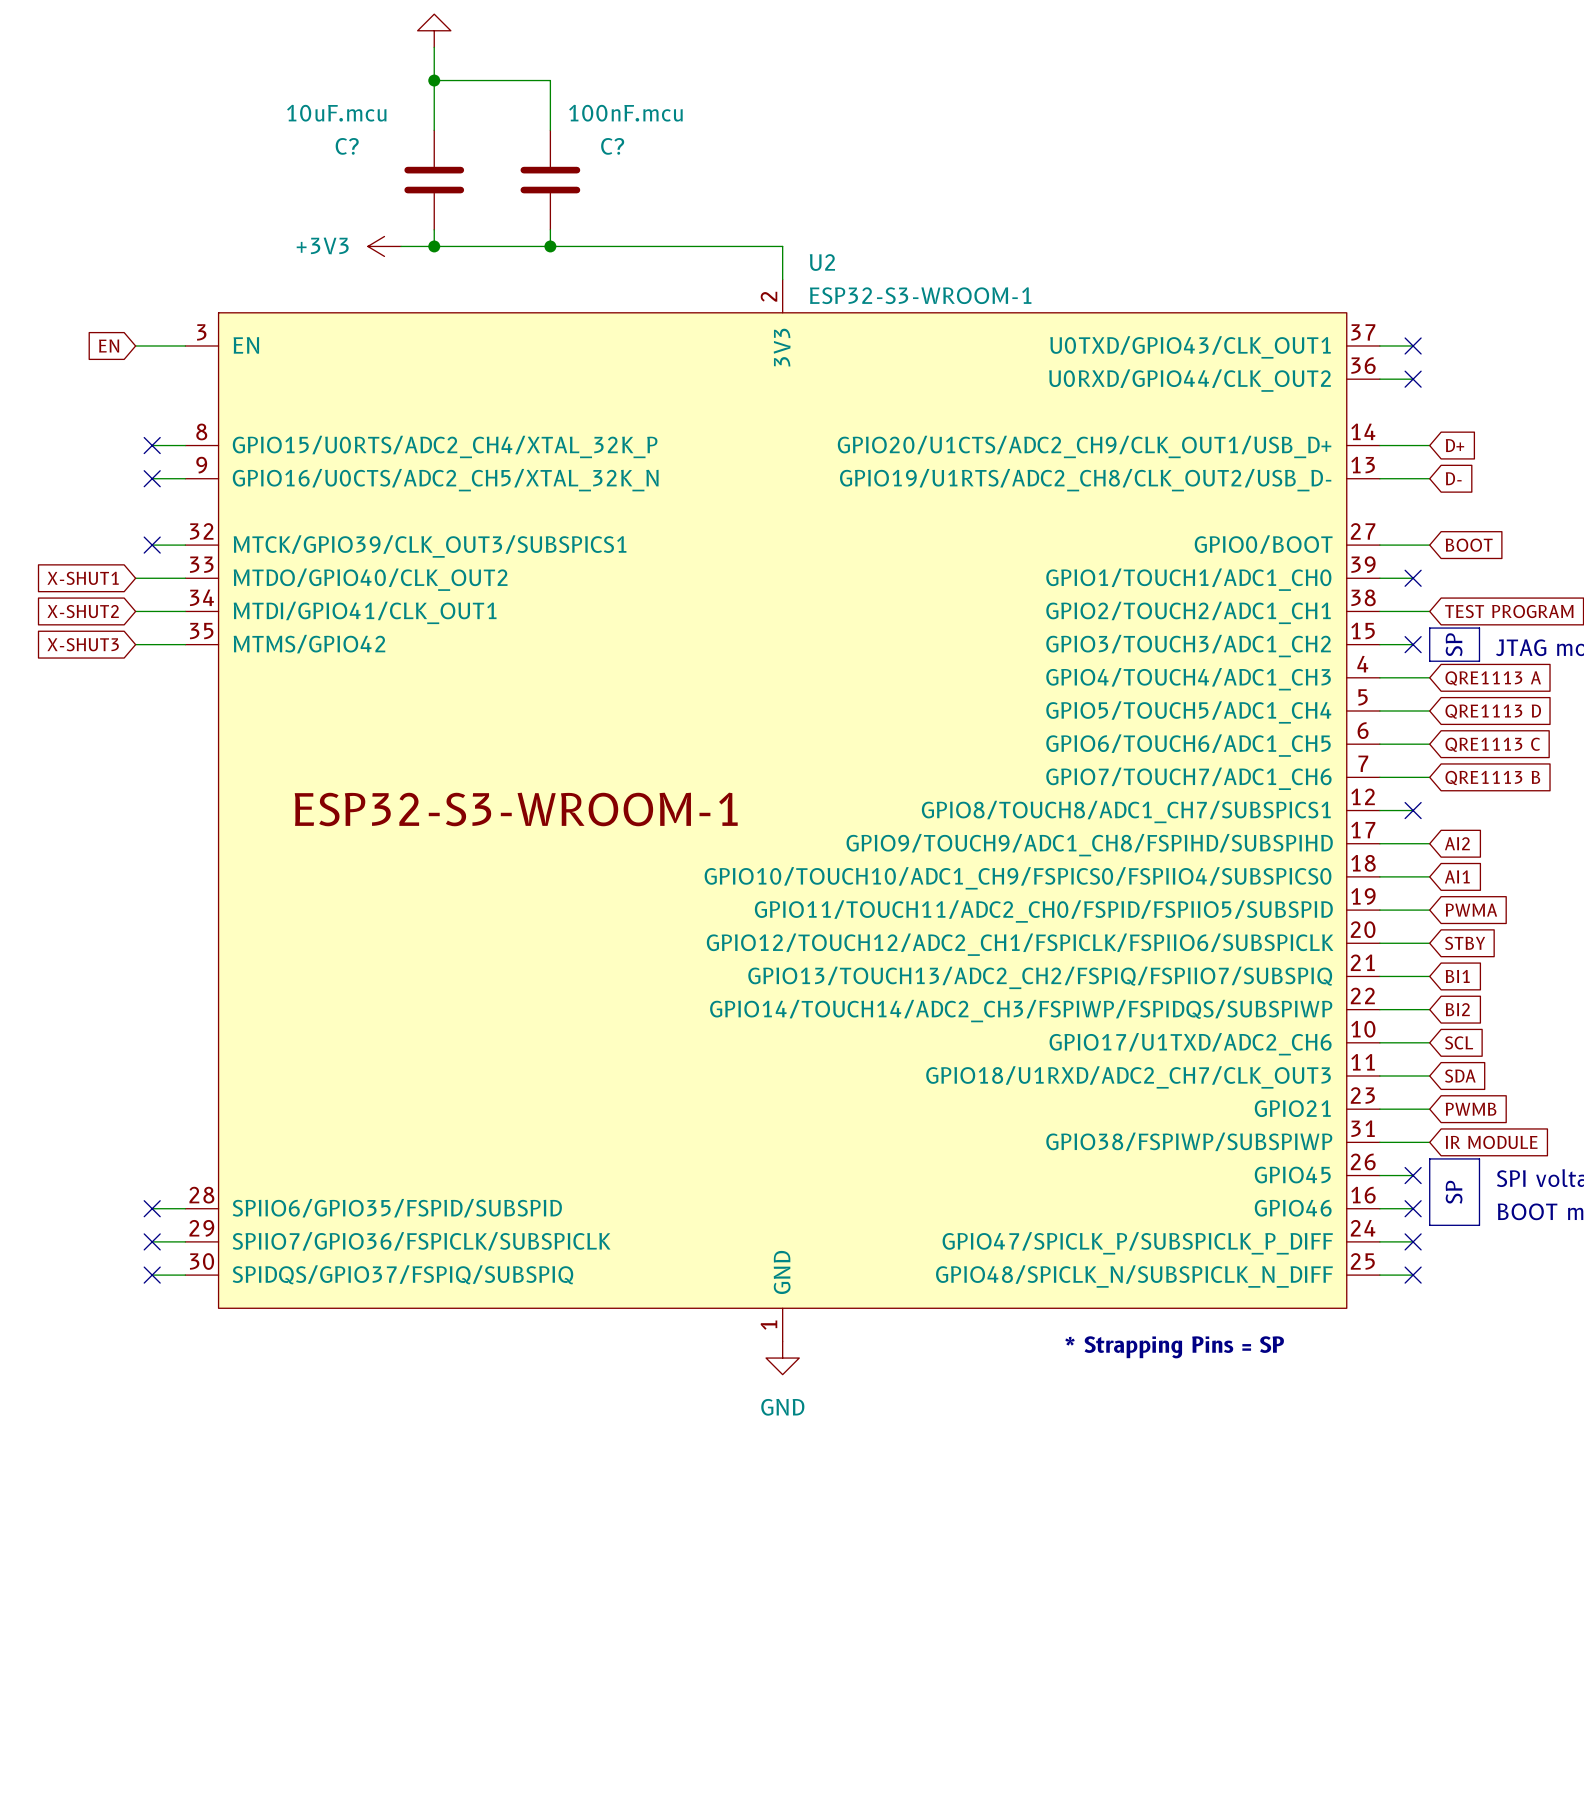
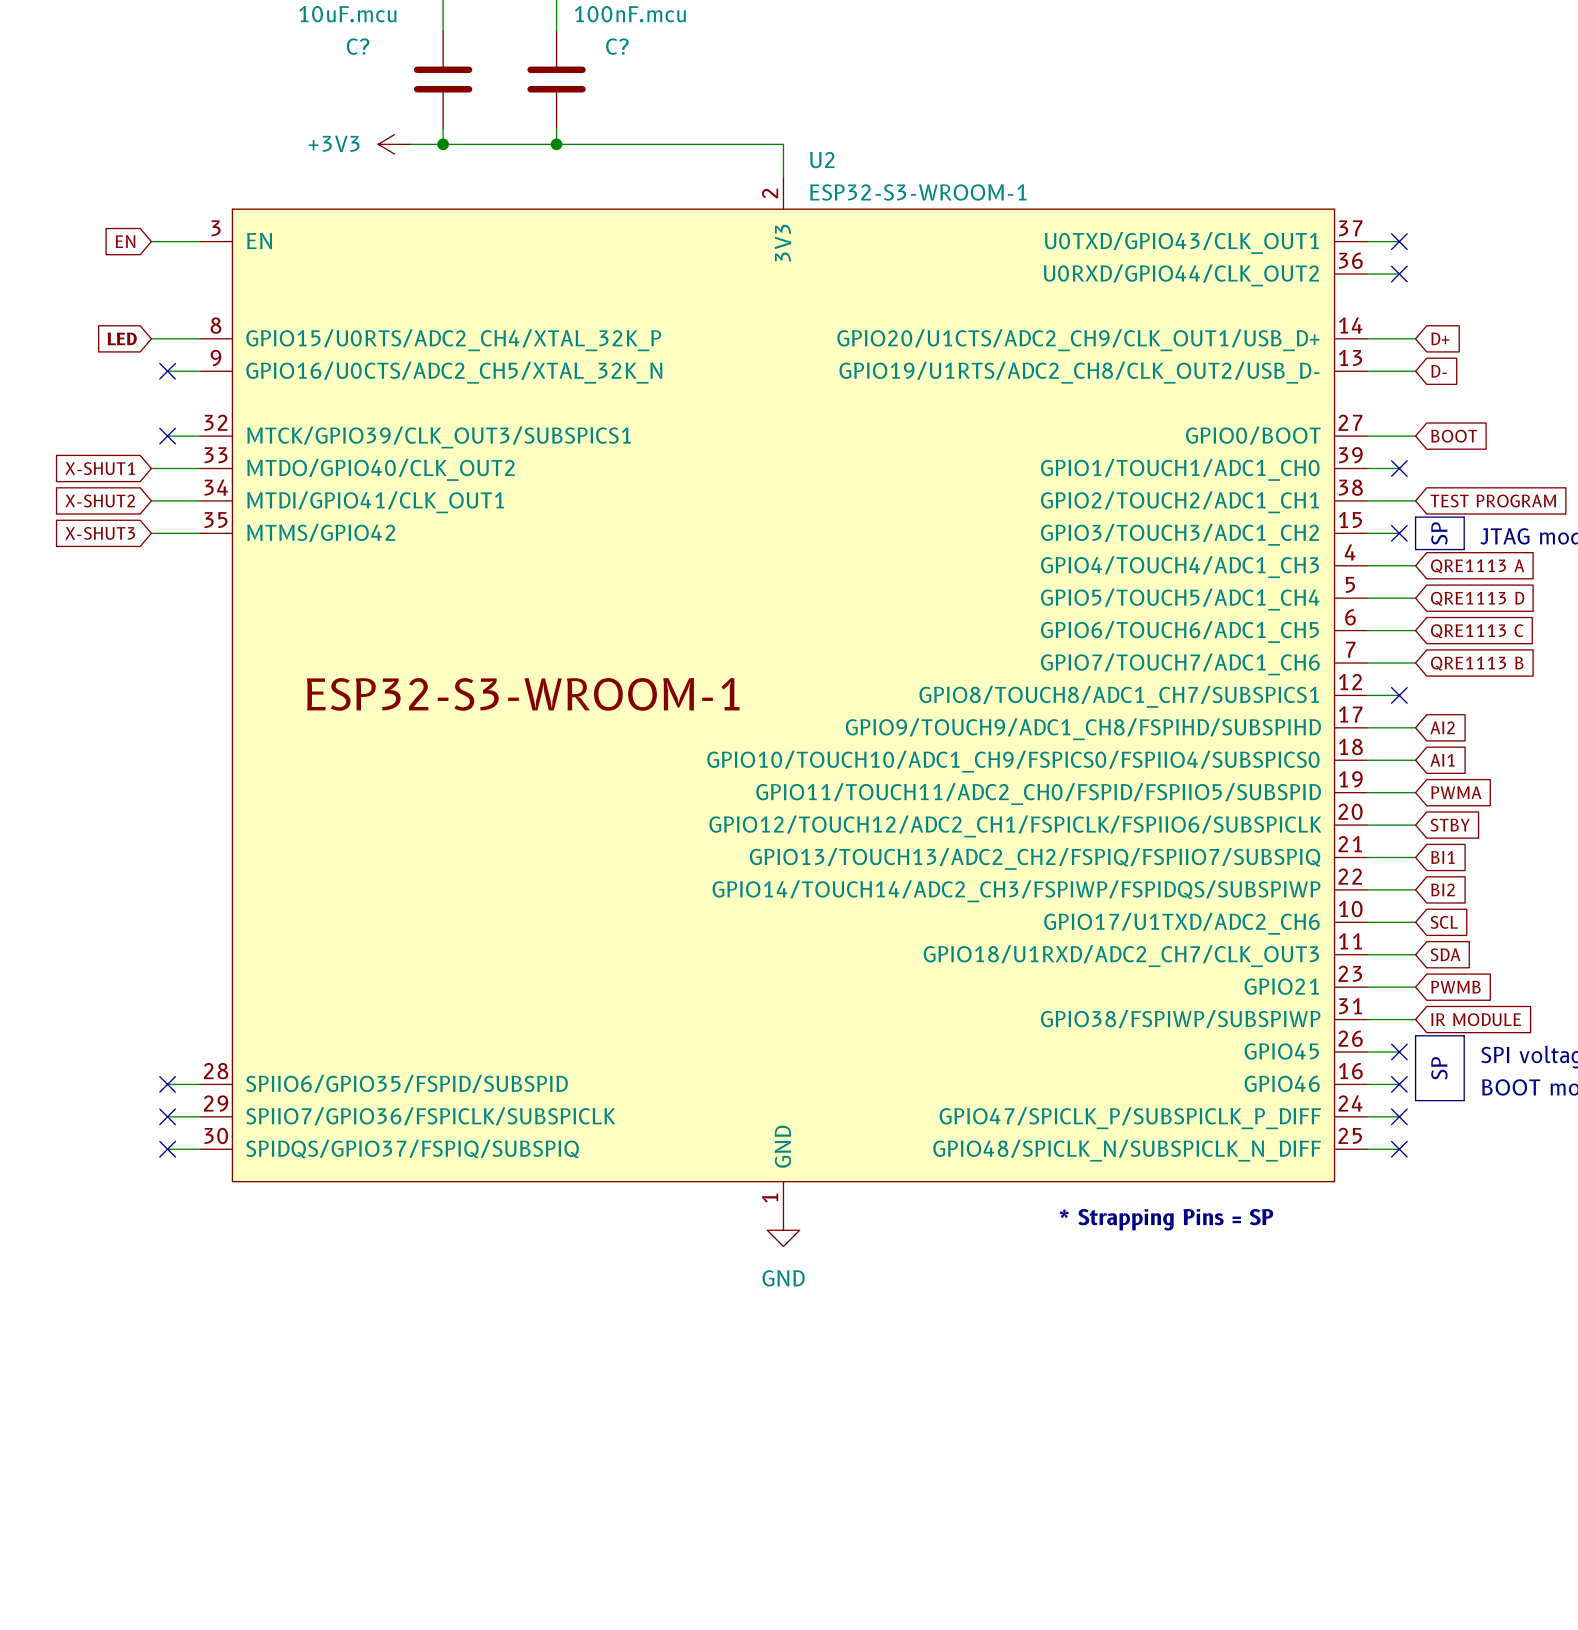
global label: none -> LED (122, 338)
wire: none -> (151, 338) (167, 338)
no-connect mark: (152, 445) -> none

